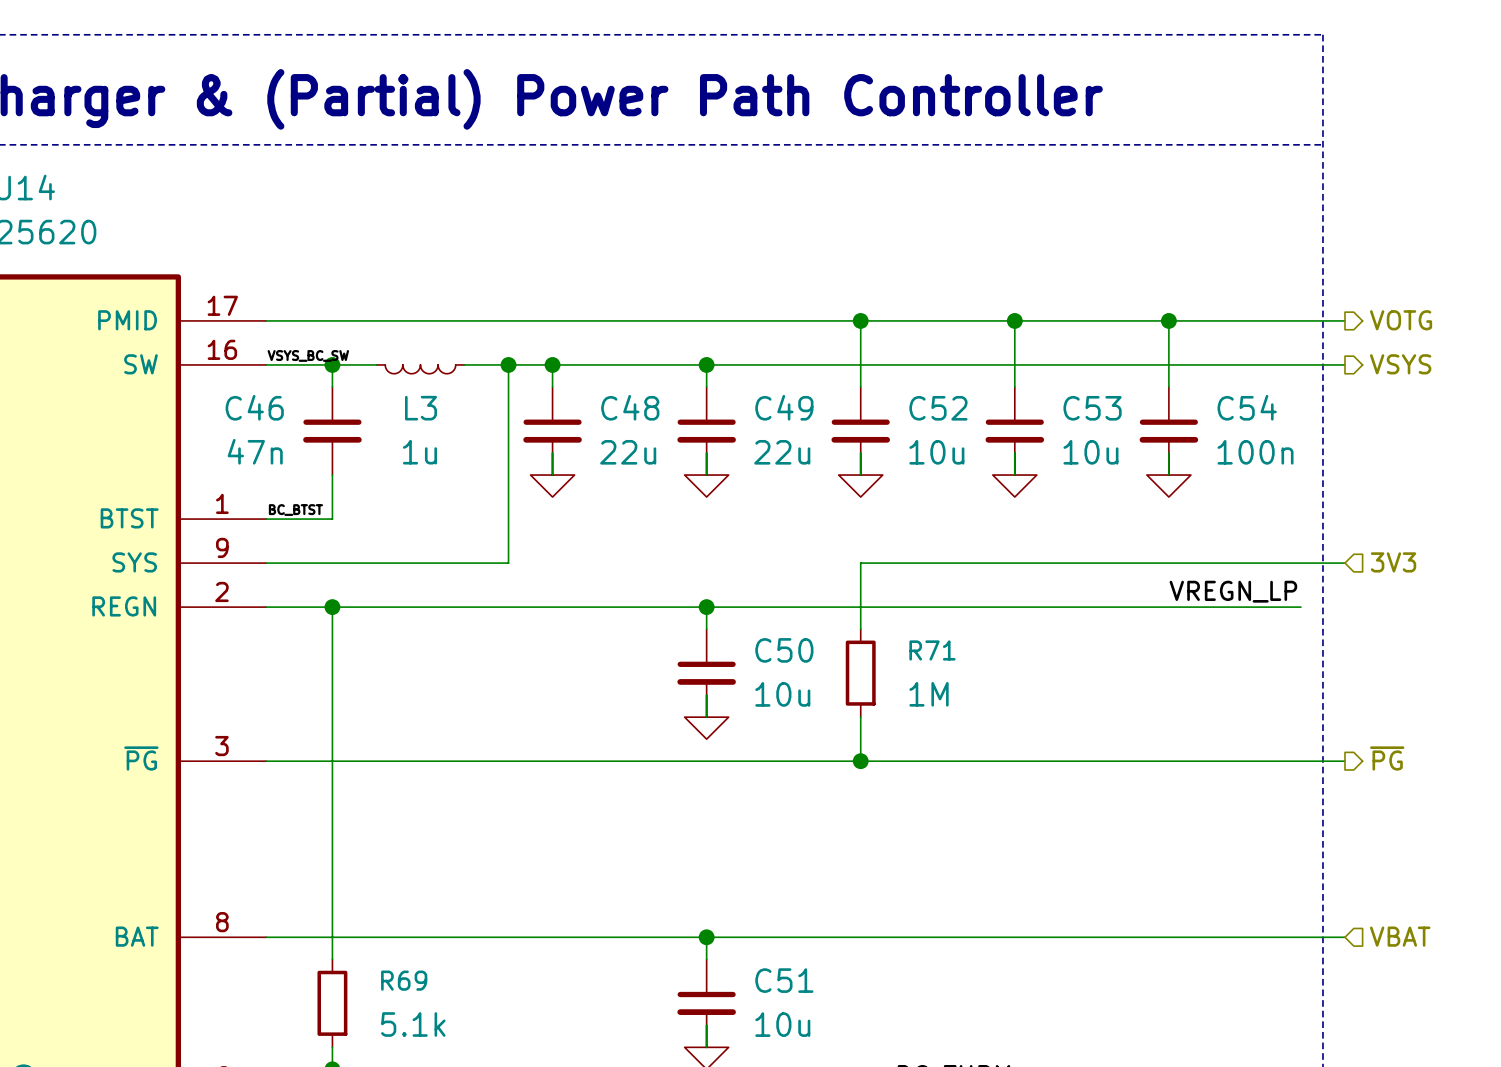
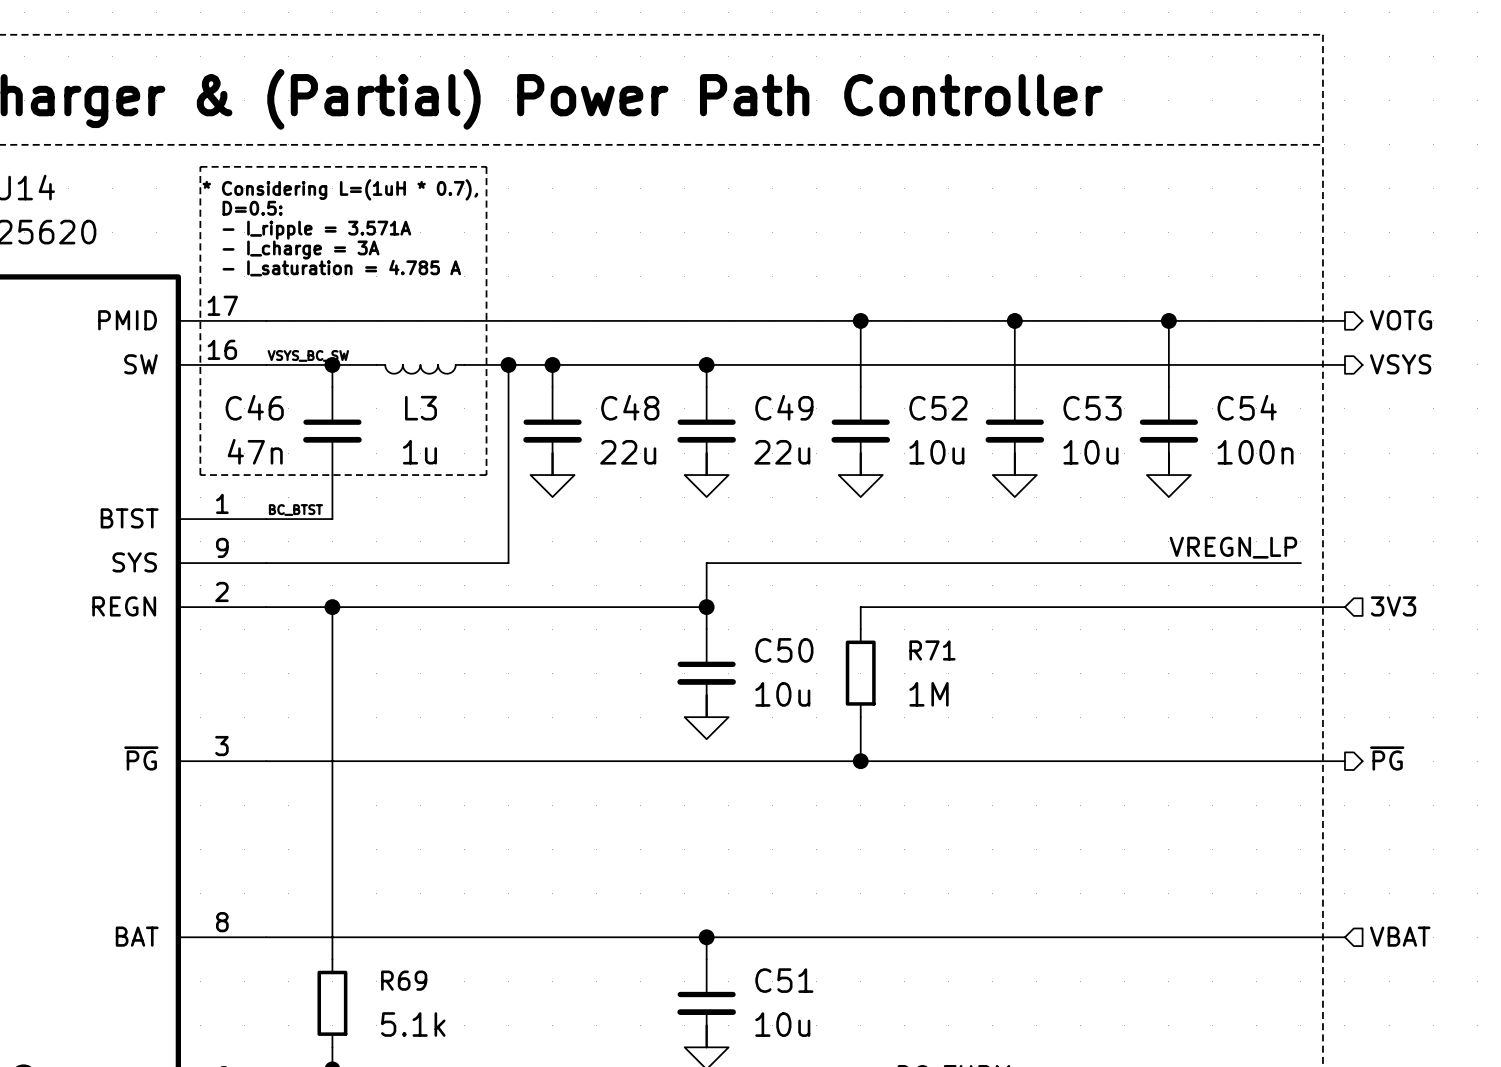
line: none -> (200, 166) (486, 166) (486, 475) (200, 475) (200, 166)
text: none -> * Considering L=(1uH * 0.7), (340, 189)
text: none -> D=0.5: (252, 208)
text: none -> - I_ripple = 3.571A (316, 230)
text: none -> - I_charge = 3A (301, 250)
text: none -> - I_saturation = 4.785 A (341, 268)
hierarchical label position: 3V3 (1393, 562) -> 3V3 (1393, 606)
wire: (860, 563) (860, 607) (706, 607) -> (860, 563) (706, 563) (706, 607)
wire: (1300, 563) (1344, 563) -> (1300, 607) (1344, 607)
label position: VREGN_LP (1233, 591) -> VREGN_LP (1233, 547)

